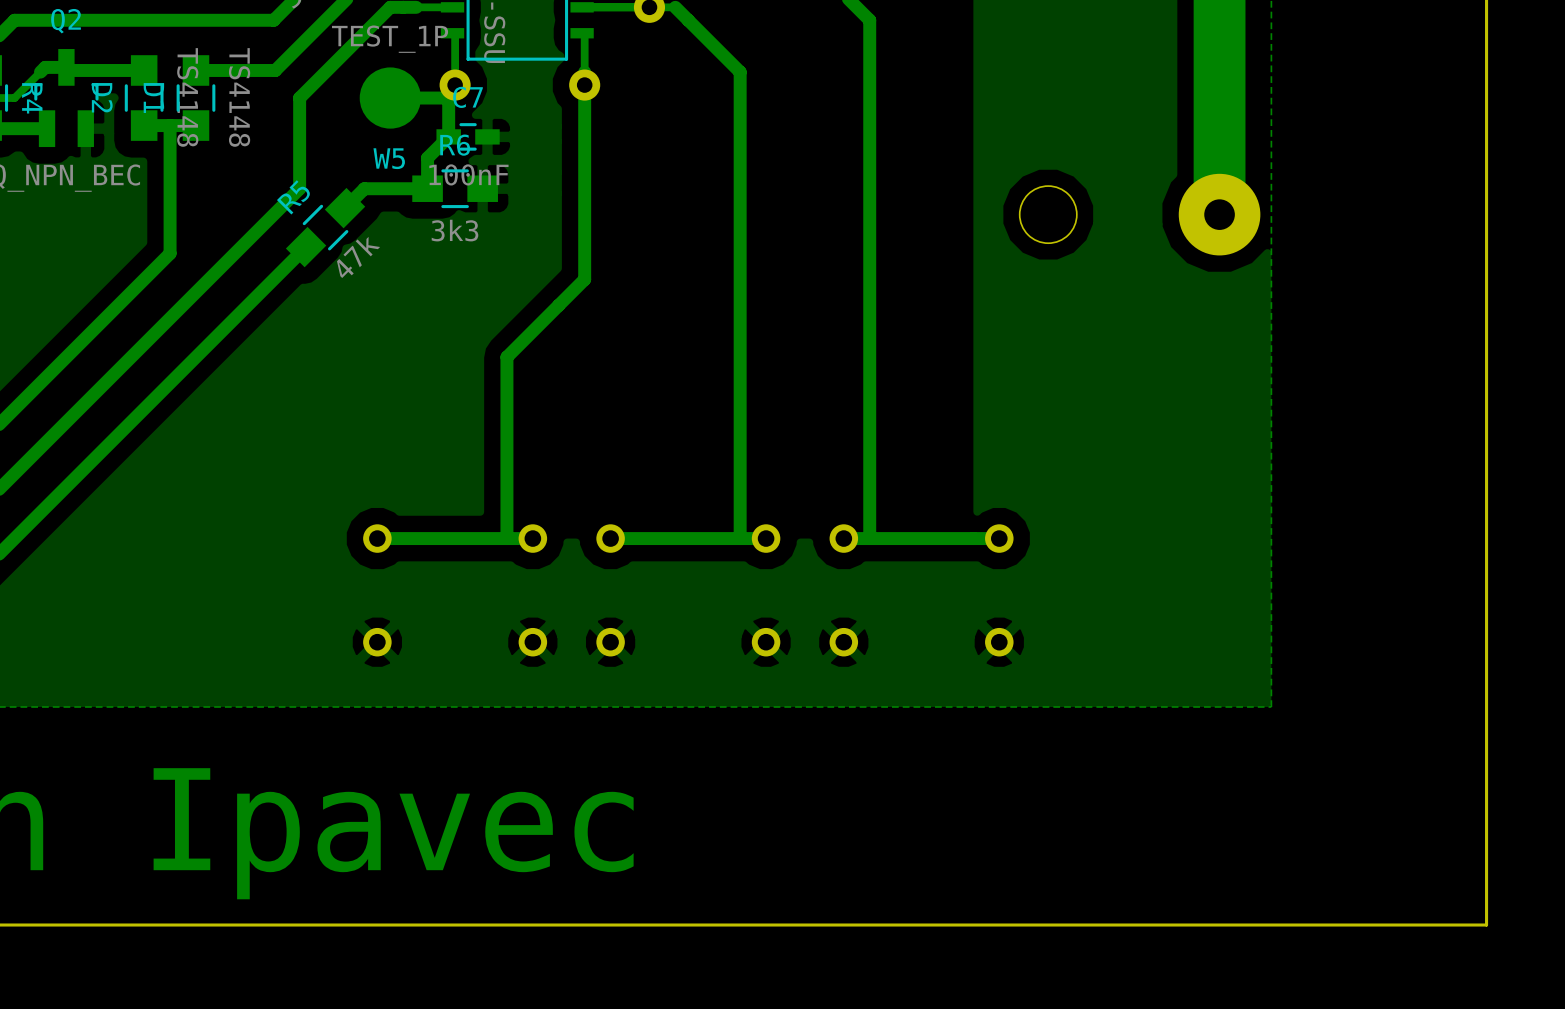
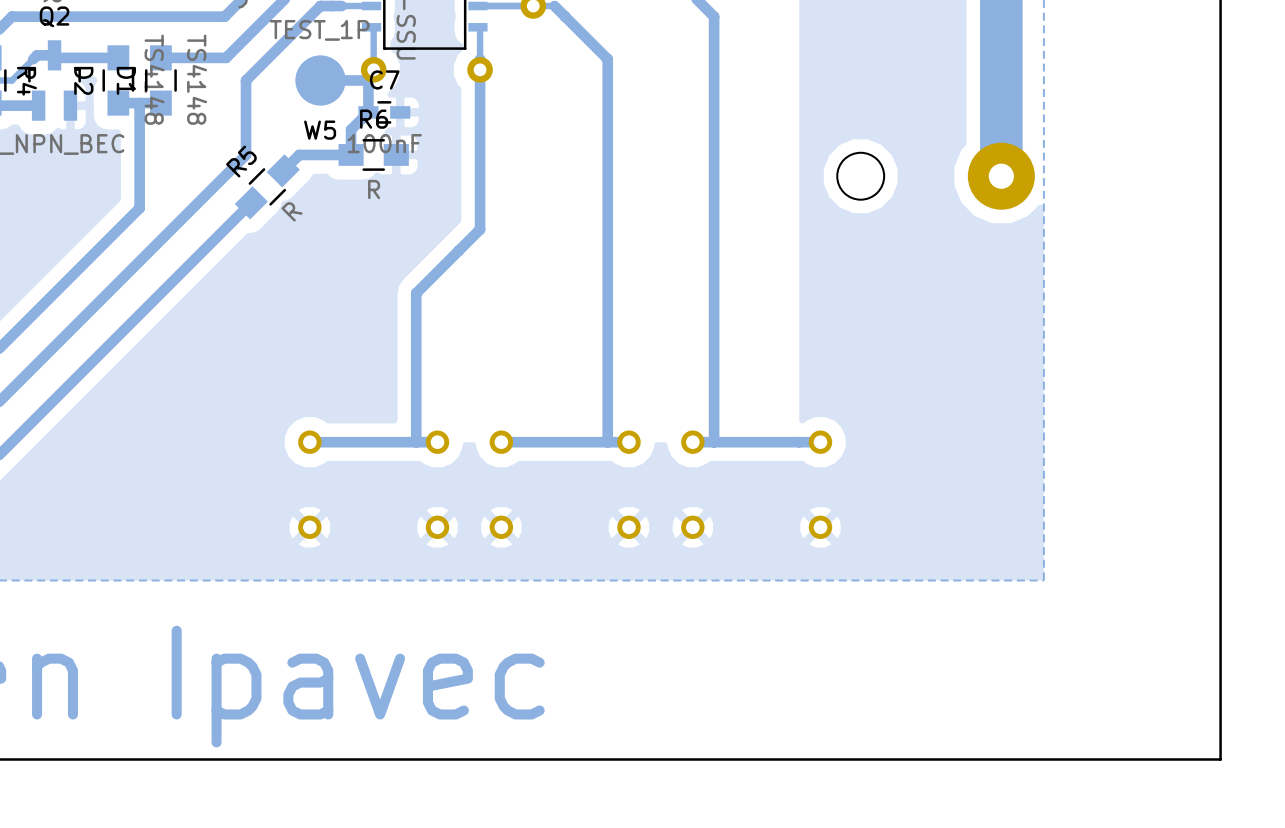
R6 value: 3k3 (455, 230) -> R (374, 189)
R5 value: 47k (358, 257) -> R (292, 211)

